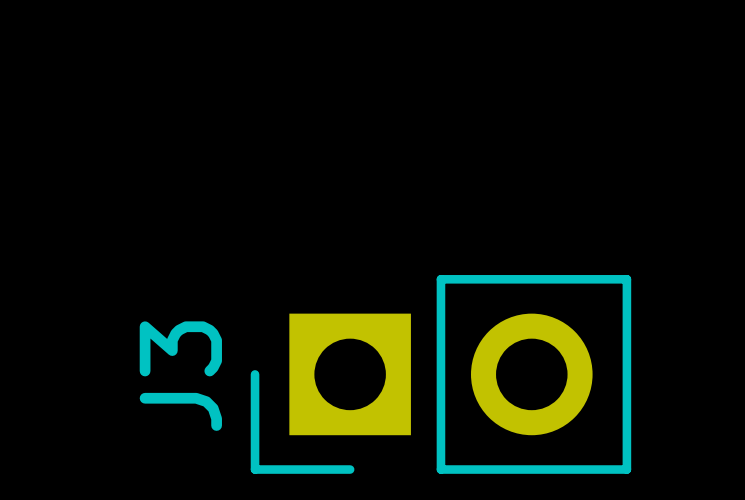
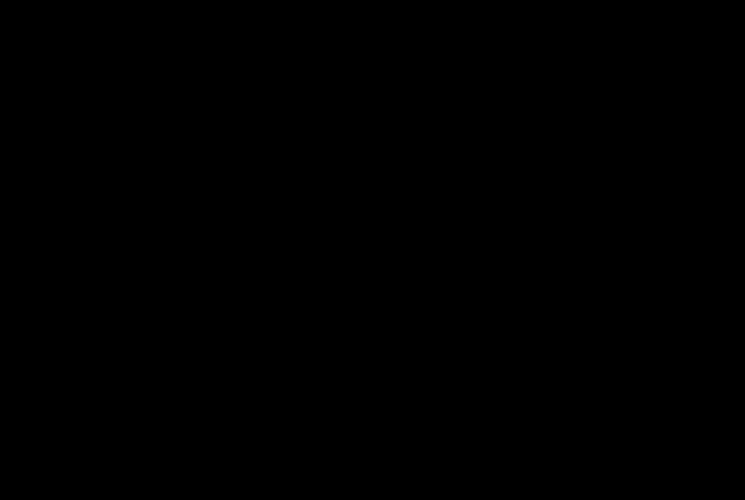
J3: (440, 374) -> none

